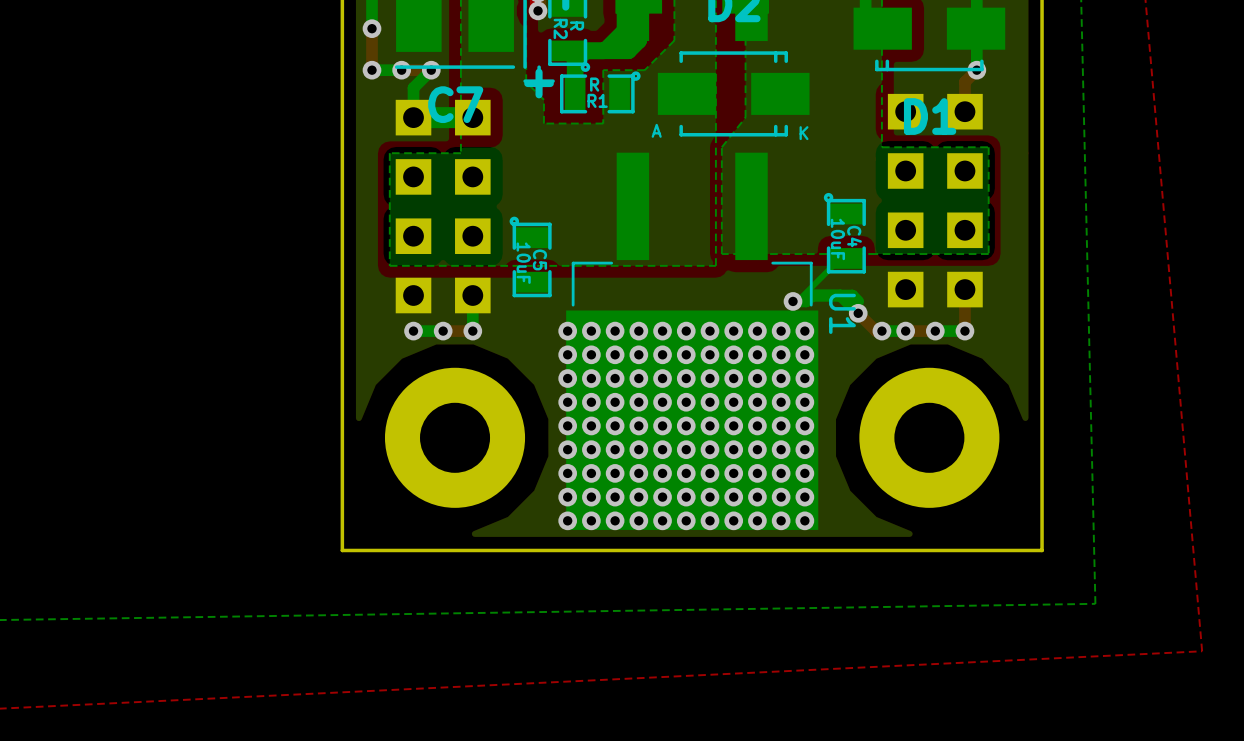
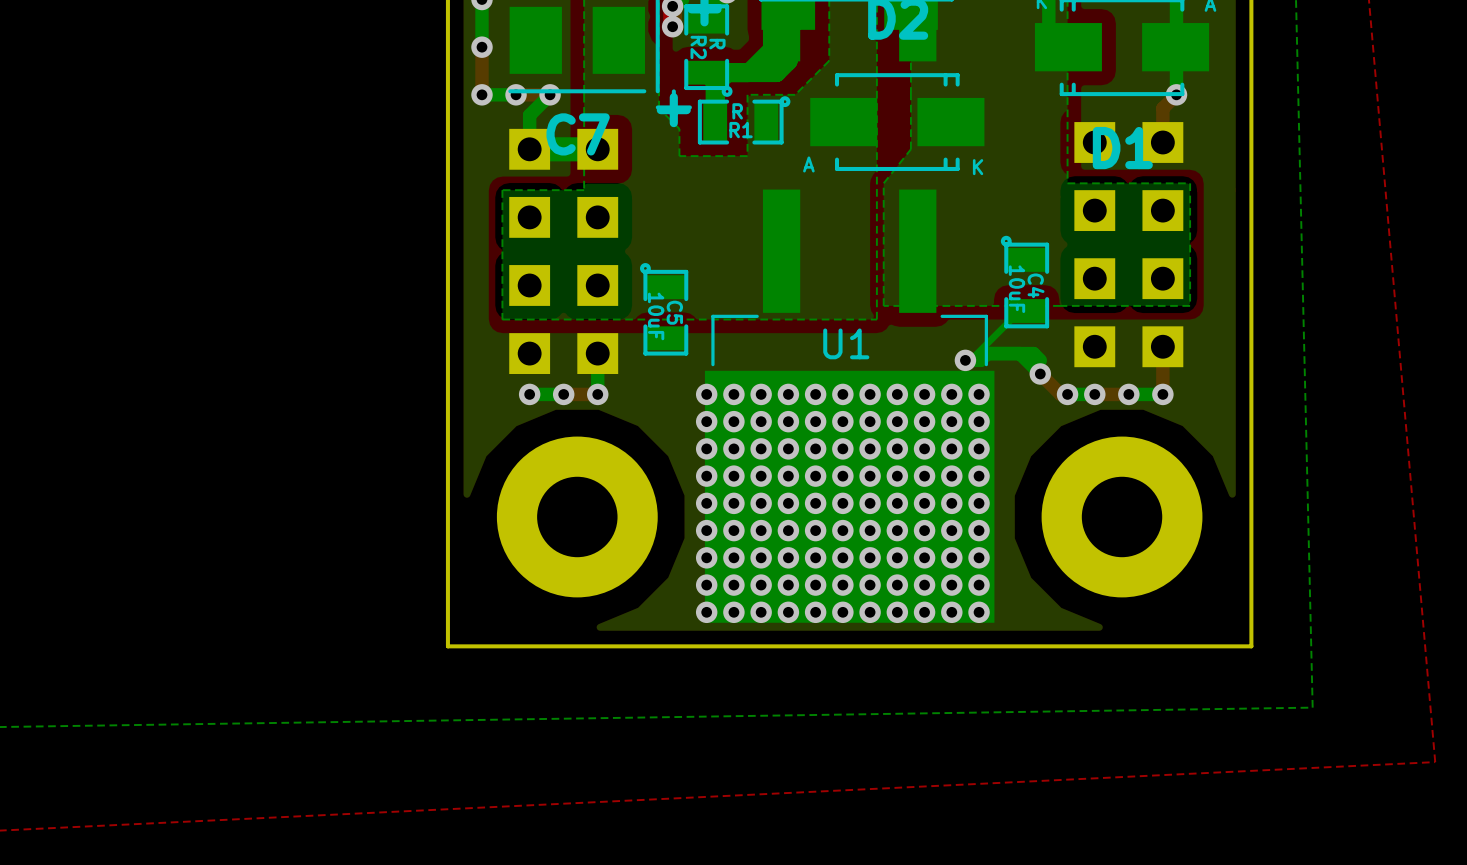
U1 name rotation: 0° (842, 313) -> 90° counterclockwise (846, 343)
U1 name position: U1 (842, 313) -> U1 (846, 343)

